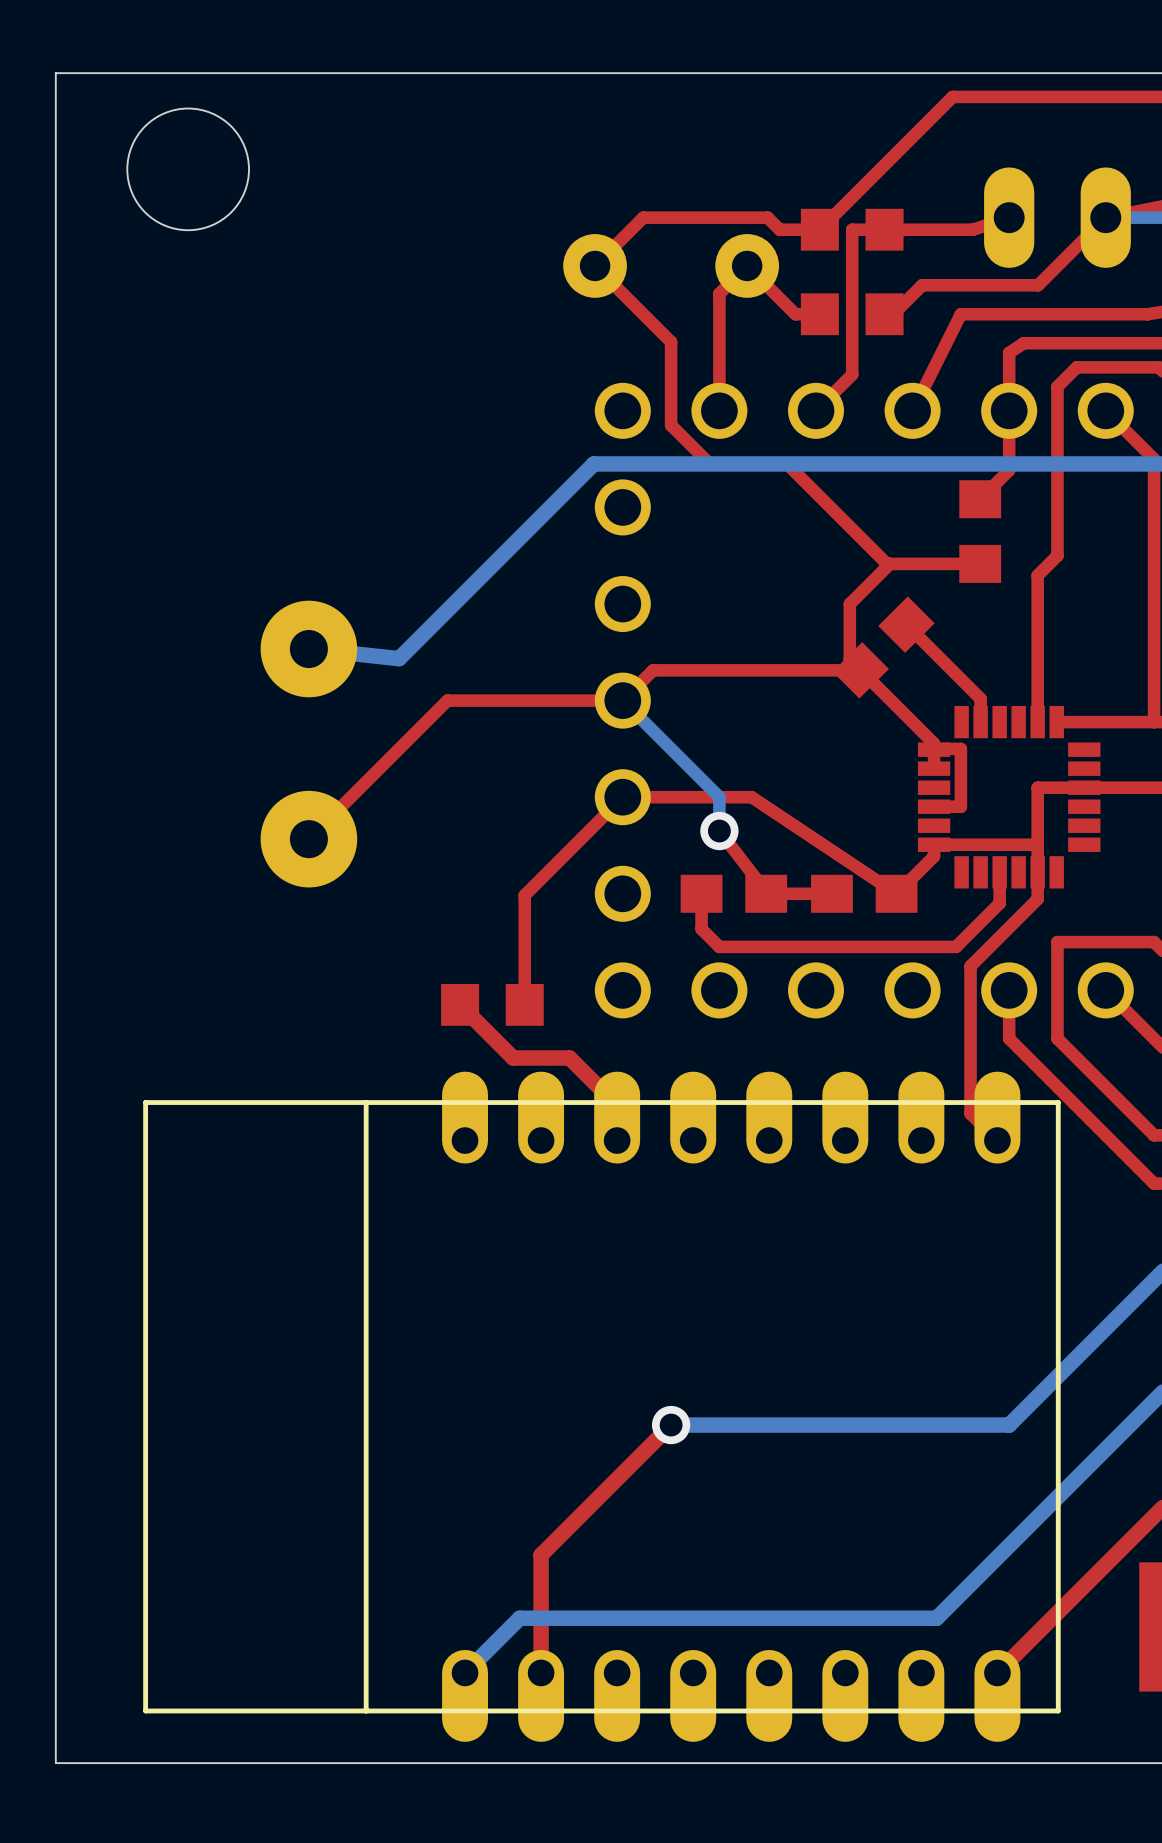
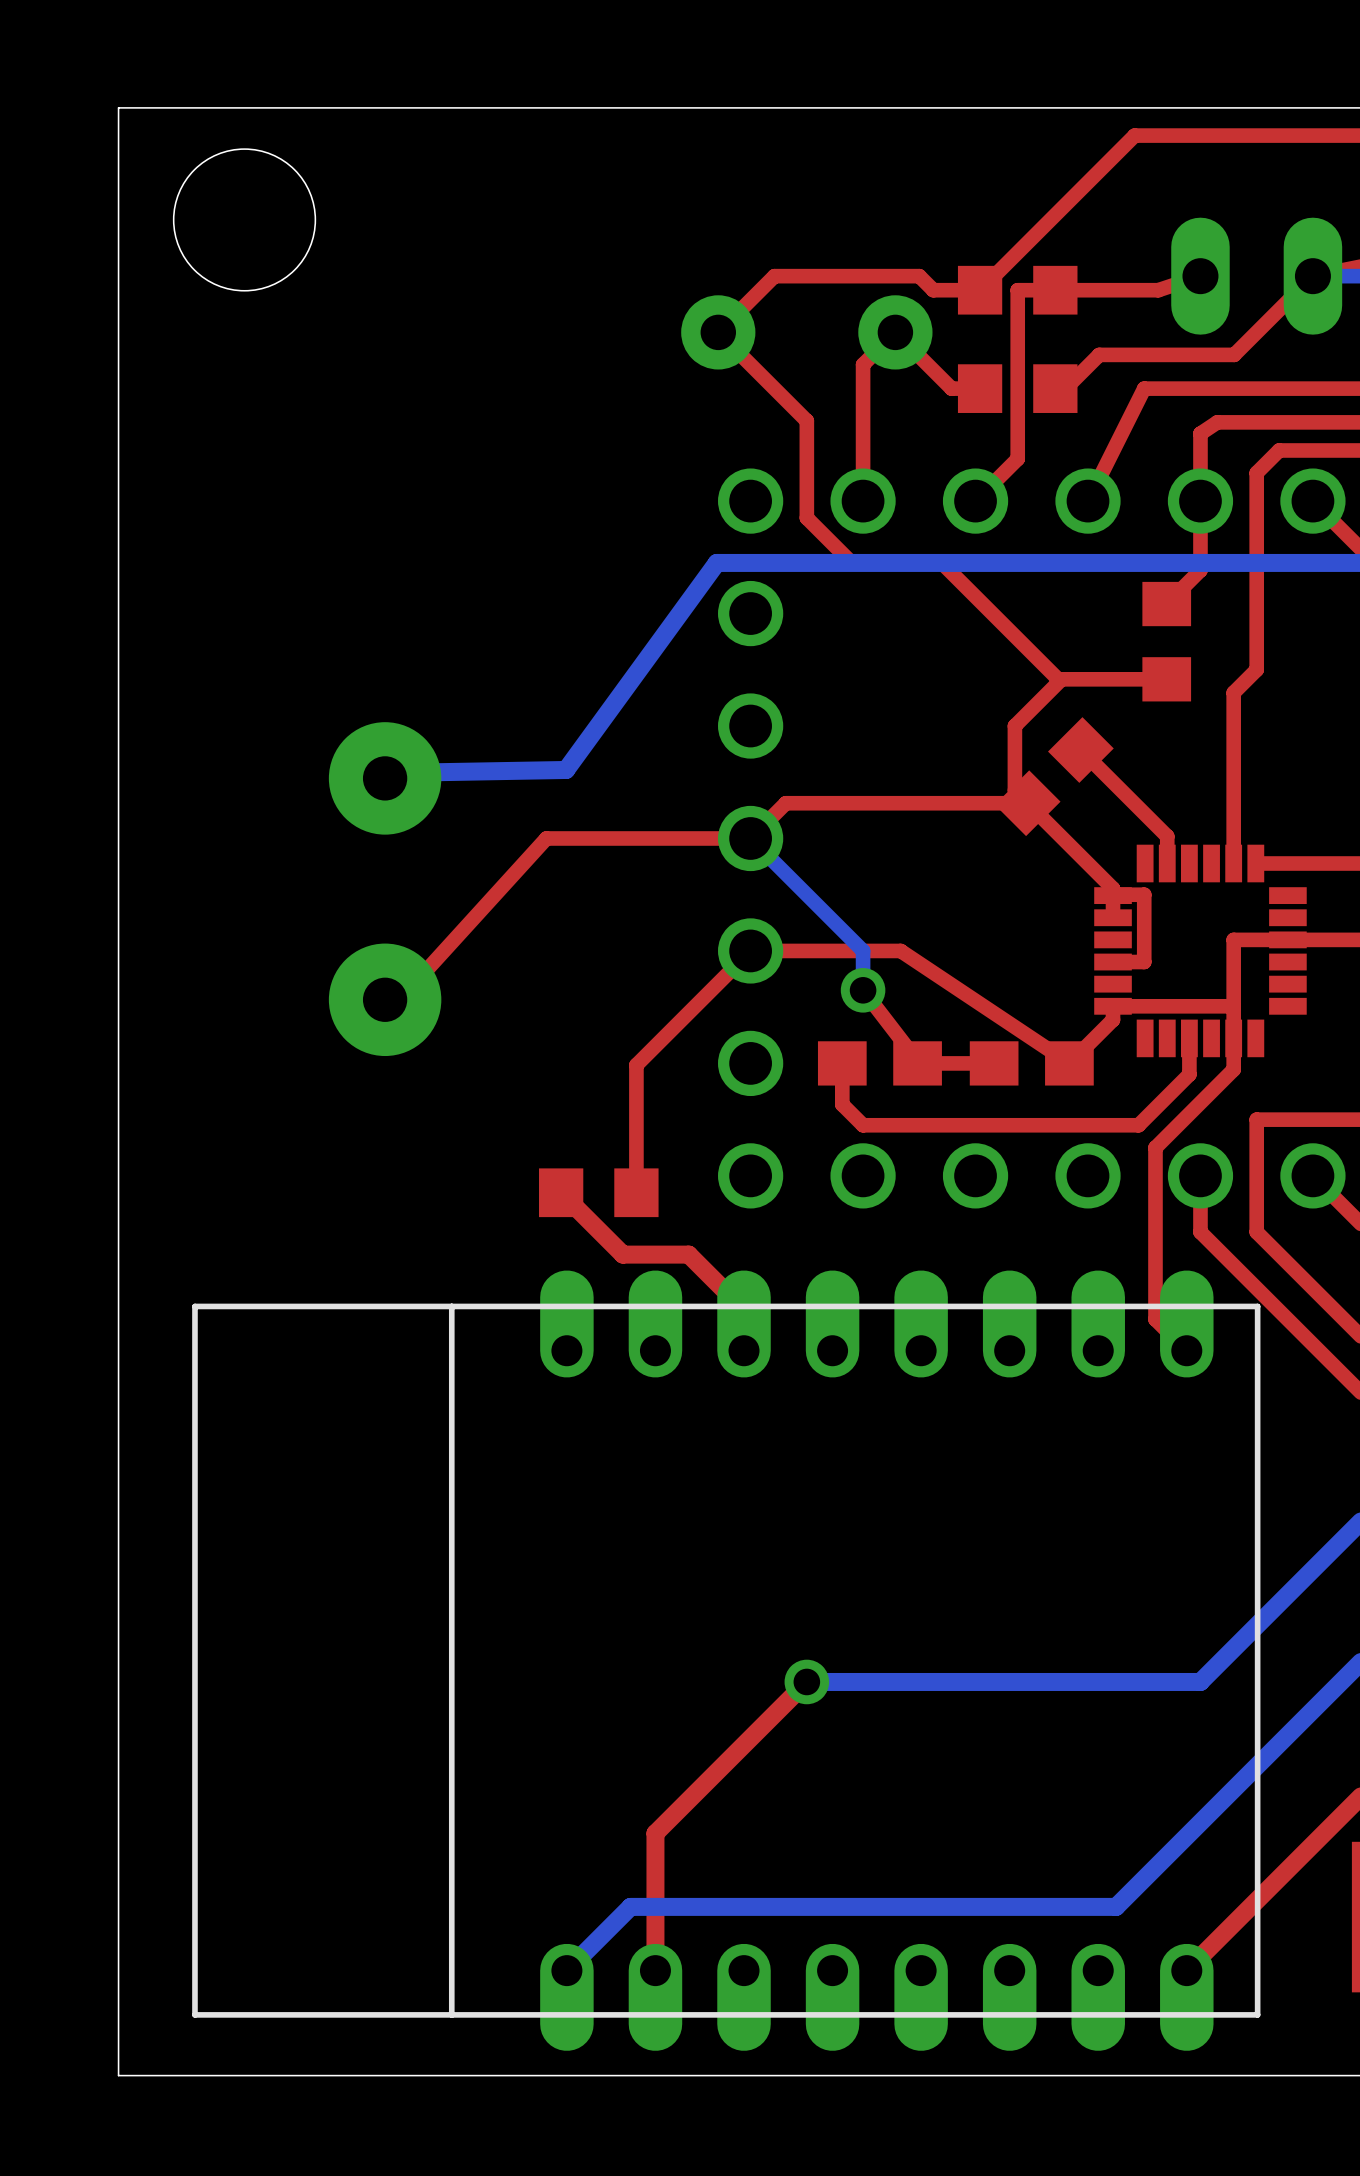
board edge: (79, 73) (55, 73) (55, 1763) (79, 1763) -> (118, 107) (118, 2075)
bottom track: (593, 463) (399, 658) (308, 649) -> (716, 562) (566, 769) (404, 772)
top track: (447, 700) (308, 839) -> (546, 838) (404, 994)

